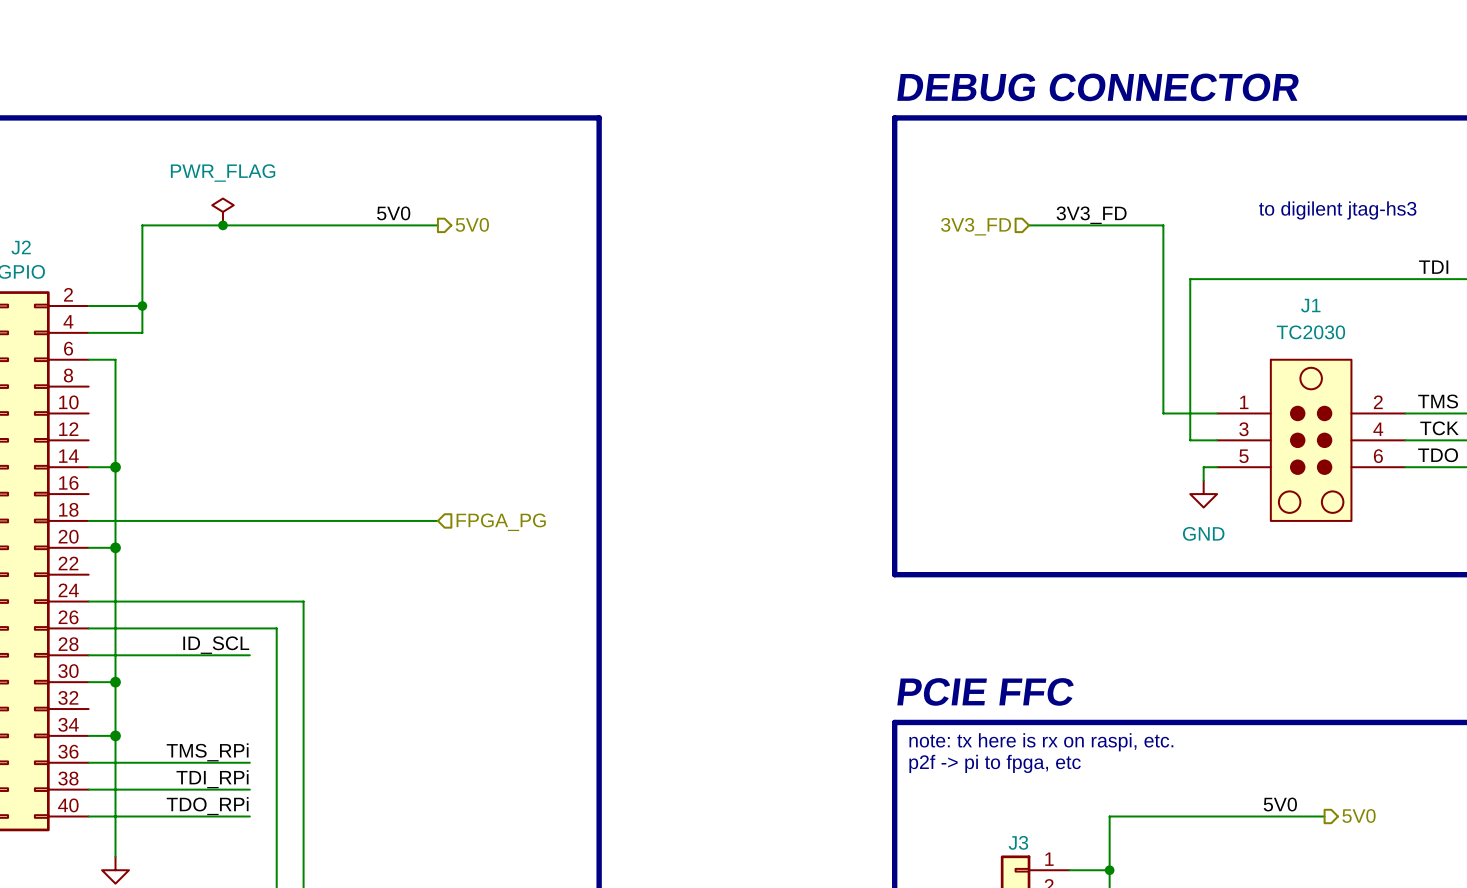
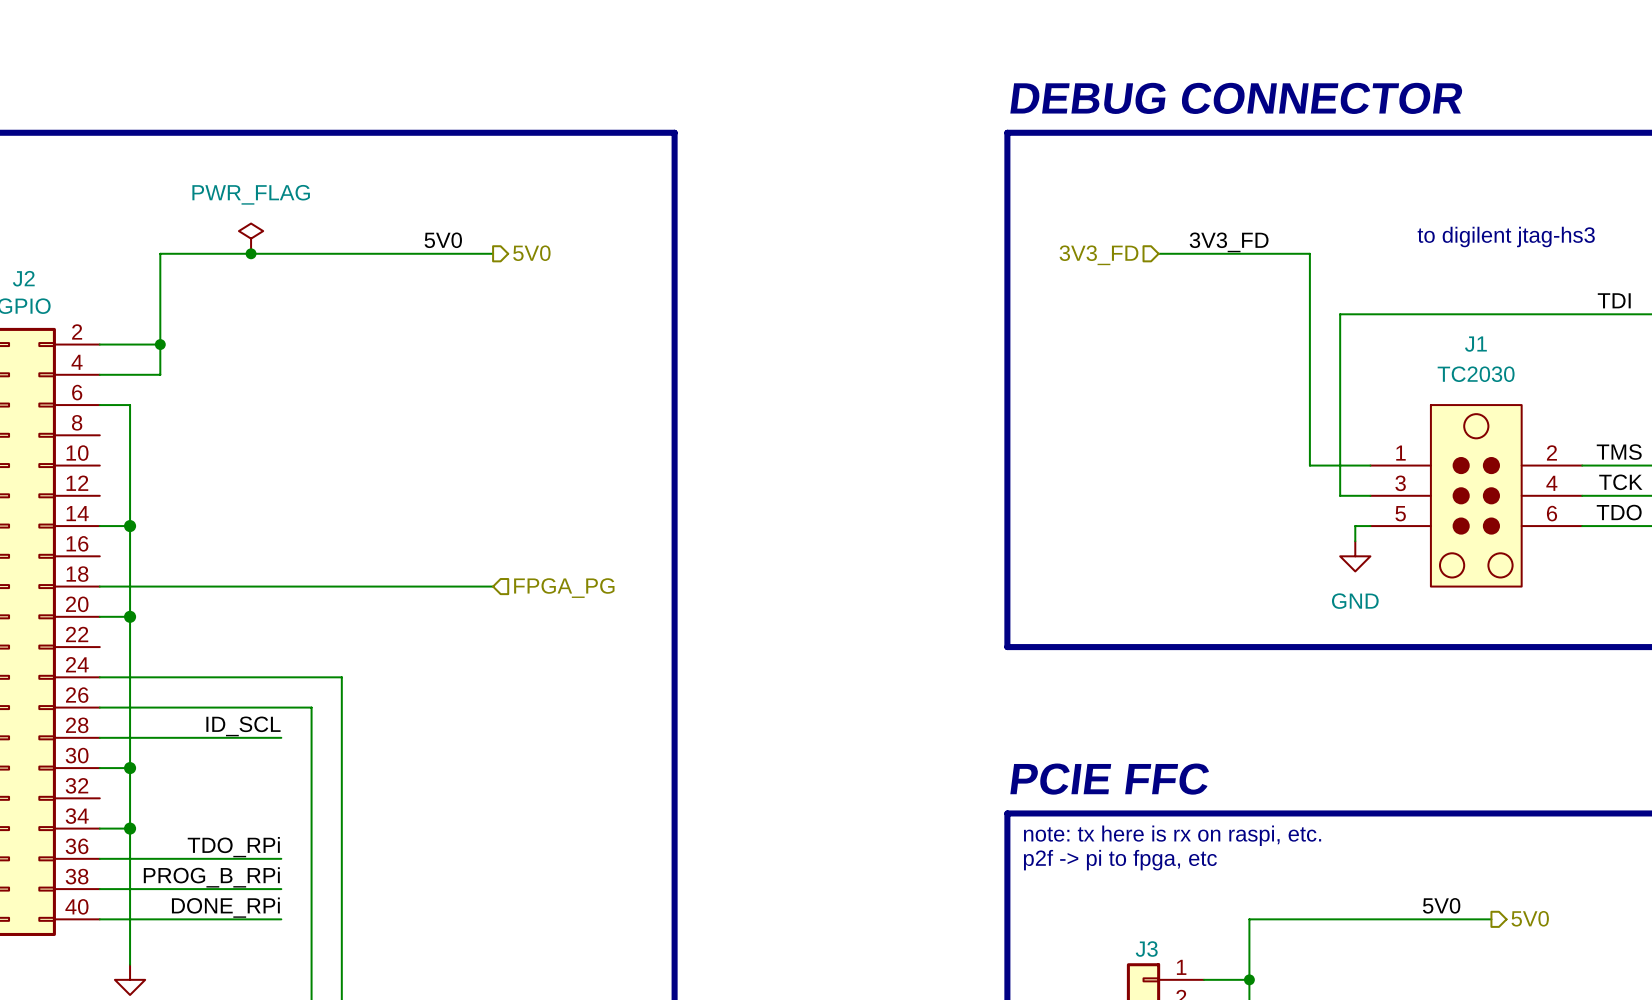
label: TMS_RPi (207, 752) -> TDO_RPi (233, 847)
label: TDI_RPi (212, 779) -> PROG_B_RPi (211, 877)
label: TDO_RPi (207, 806) -> DONE_RPi (225, 907)

